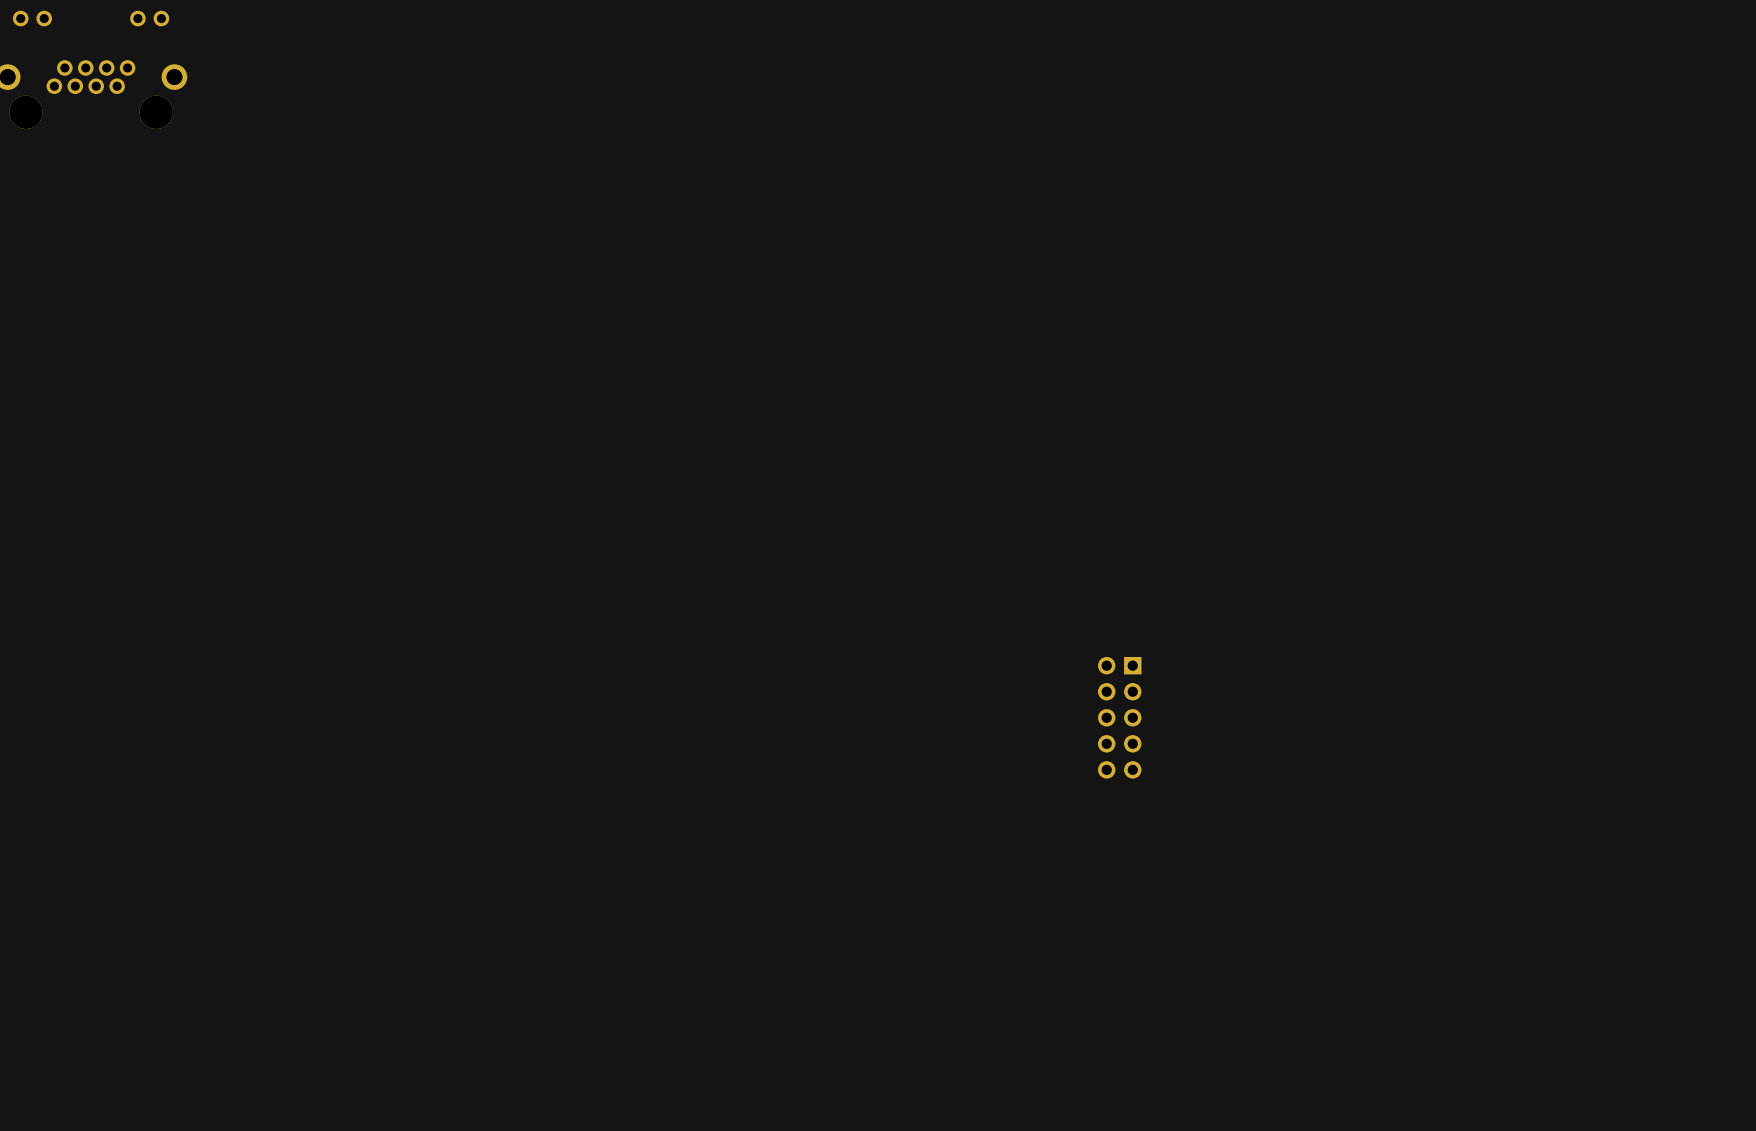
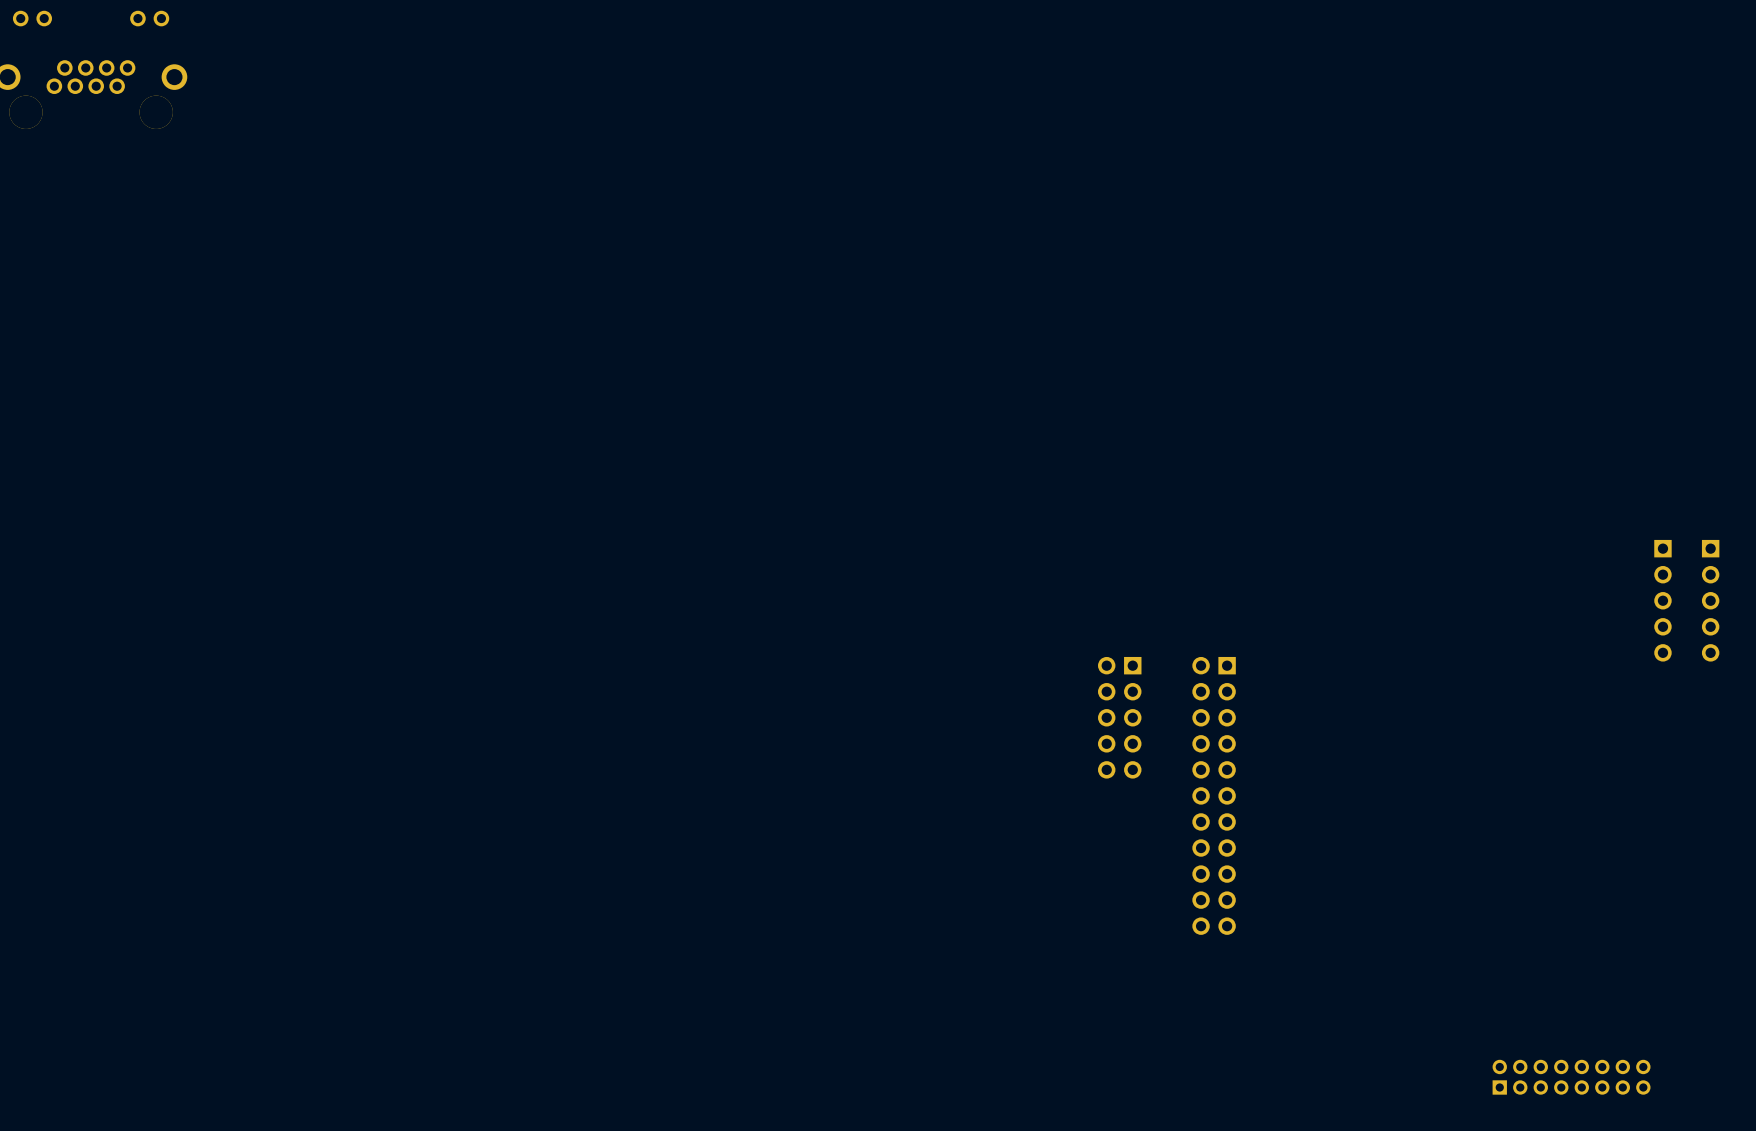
part: none -> (1662, 600)
part: none -> (1710, 600)
part: none -> (1214, 795)
part: none -> (1571, 1077)

